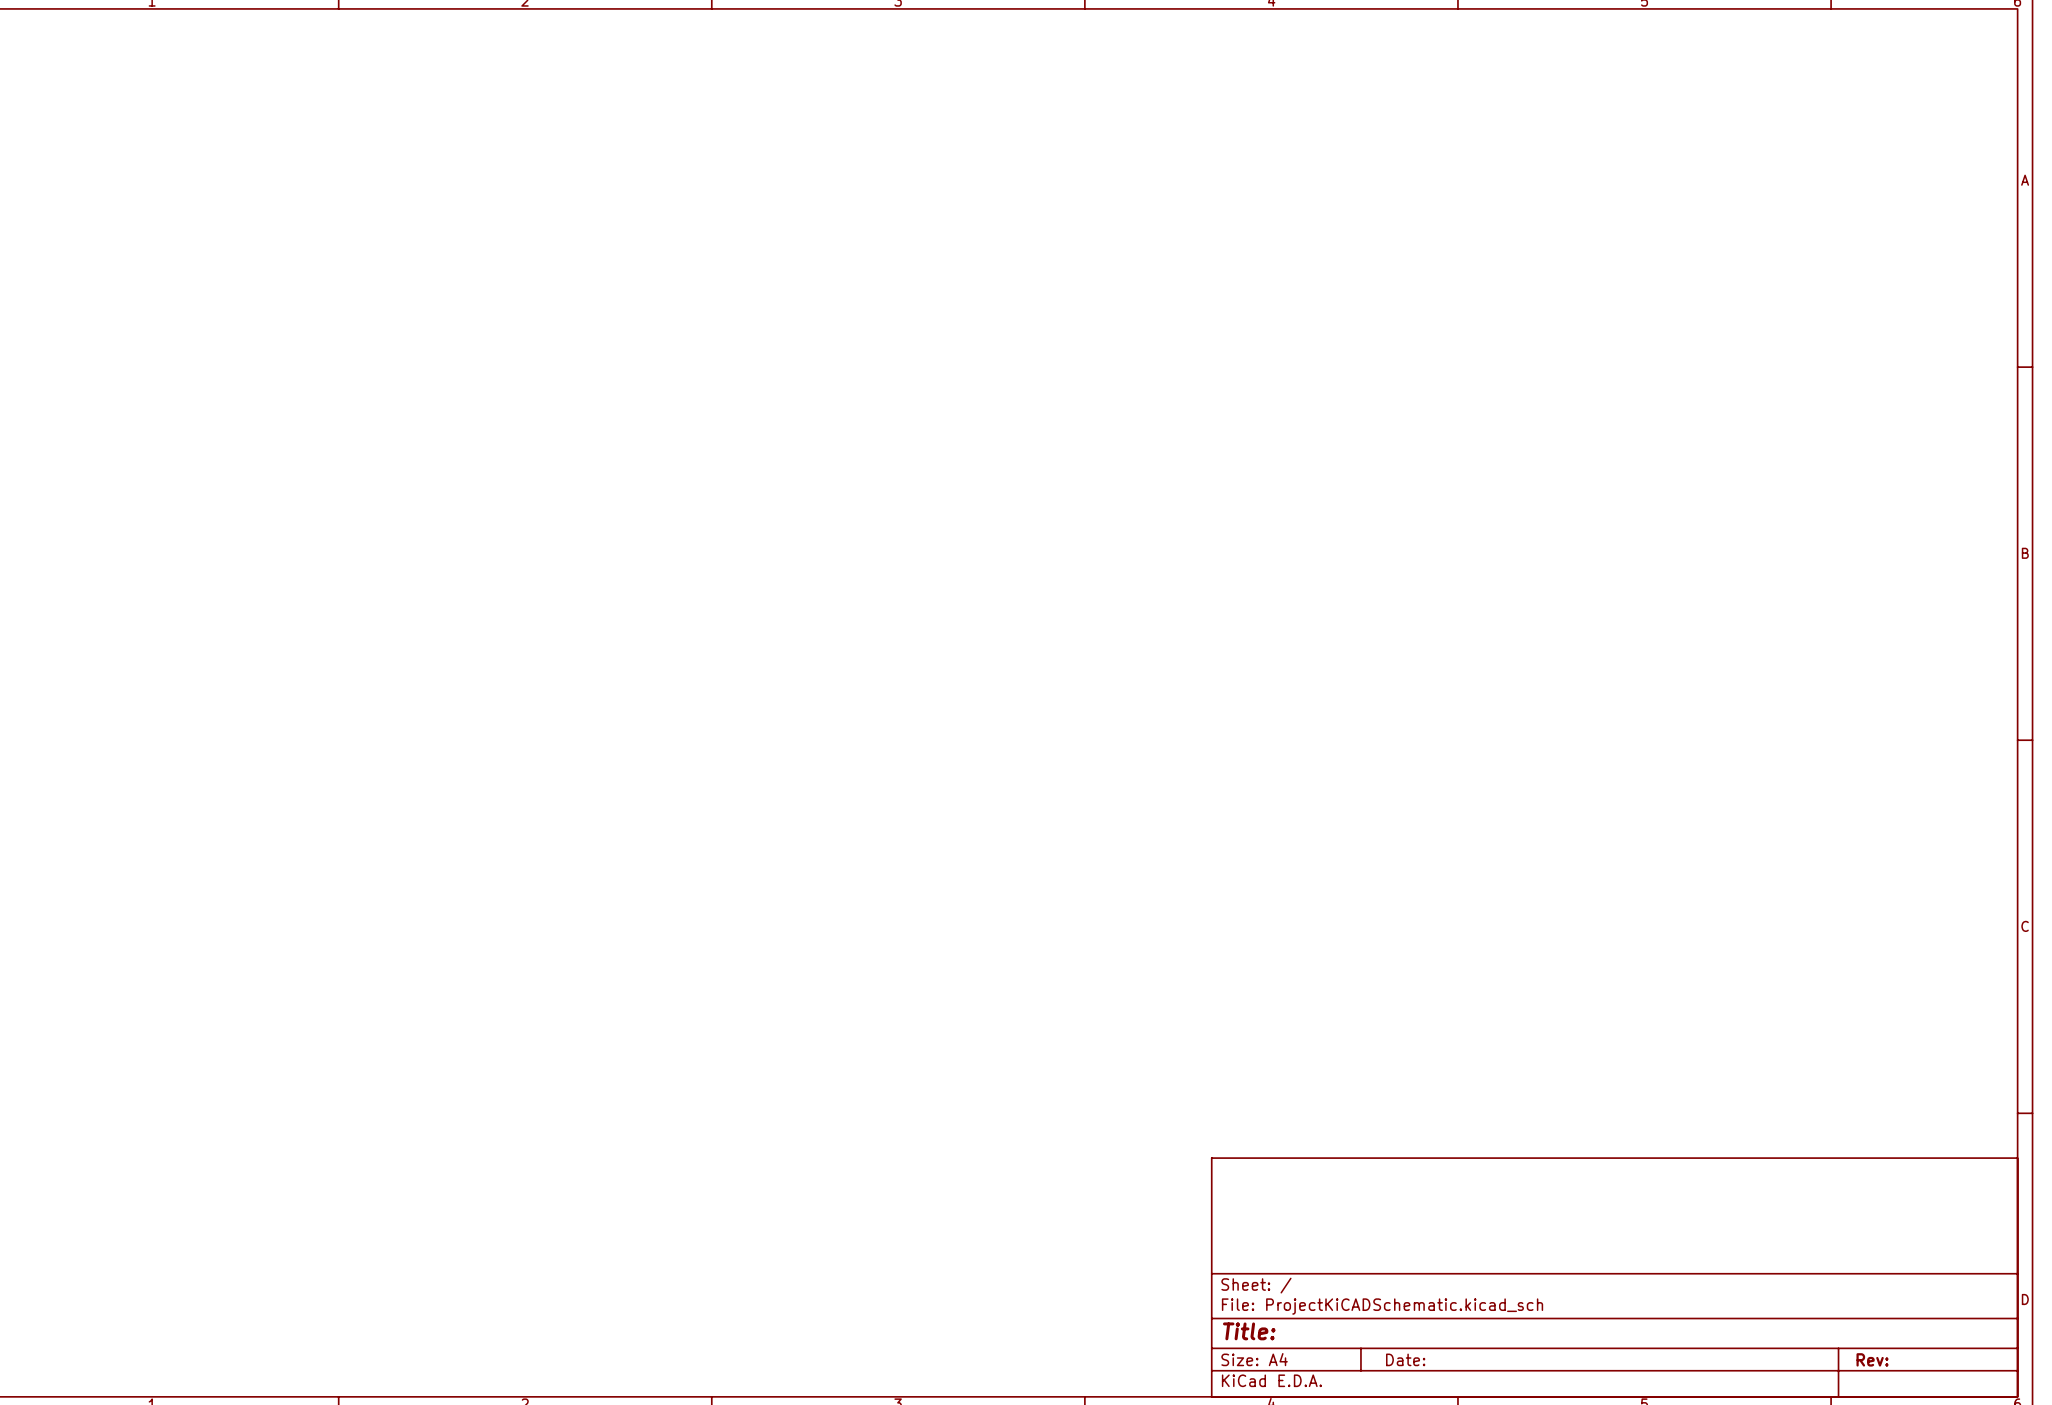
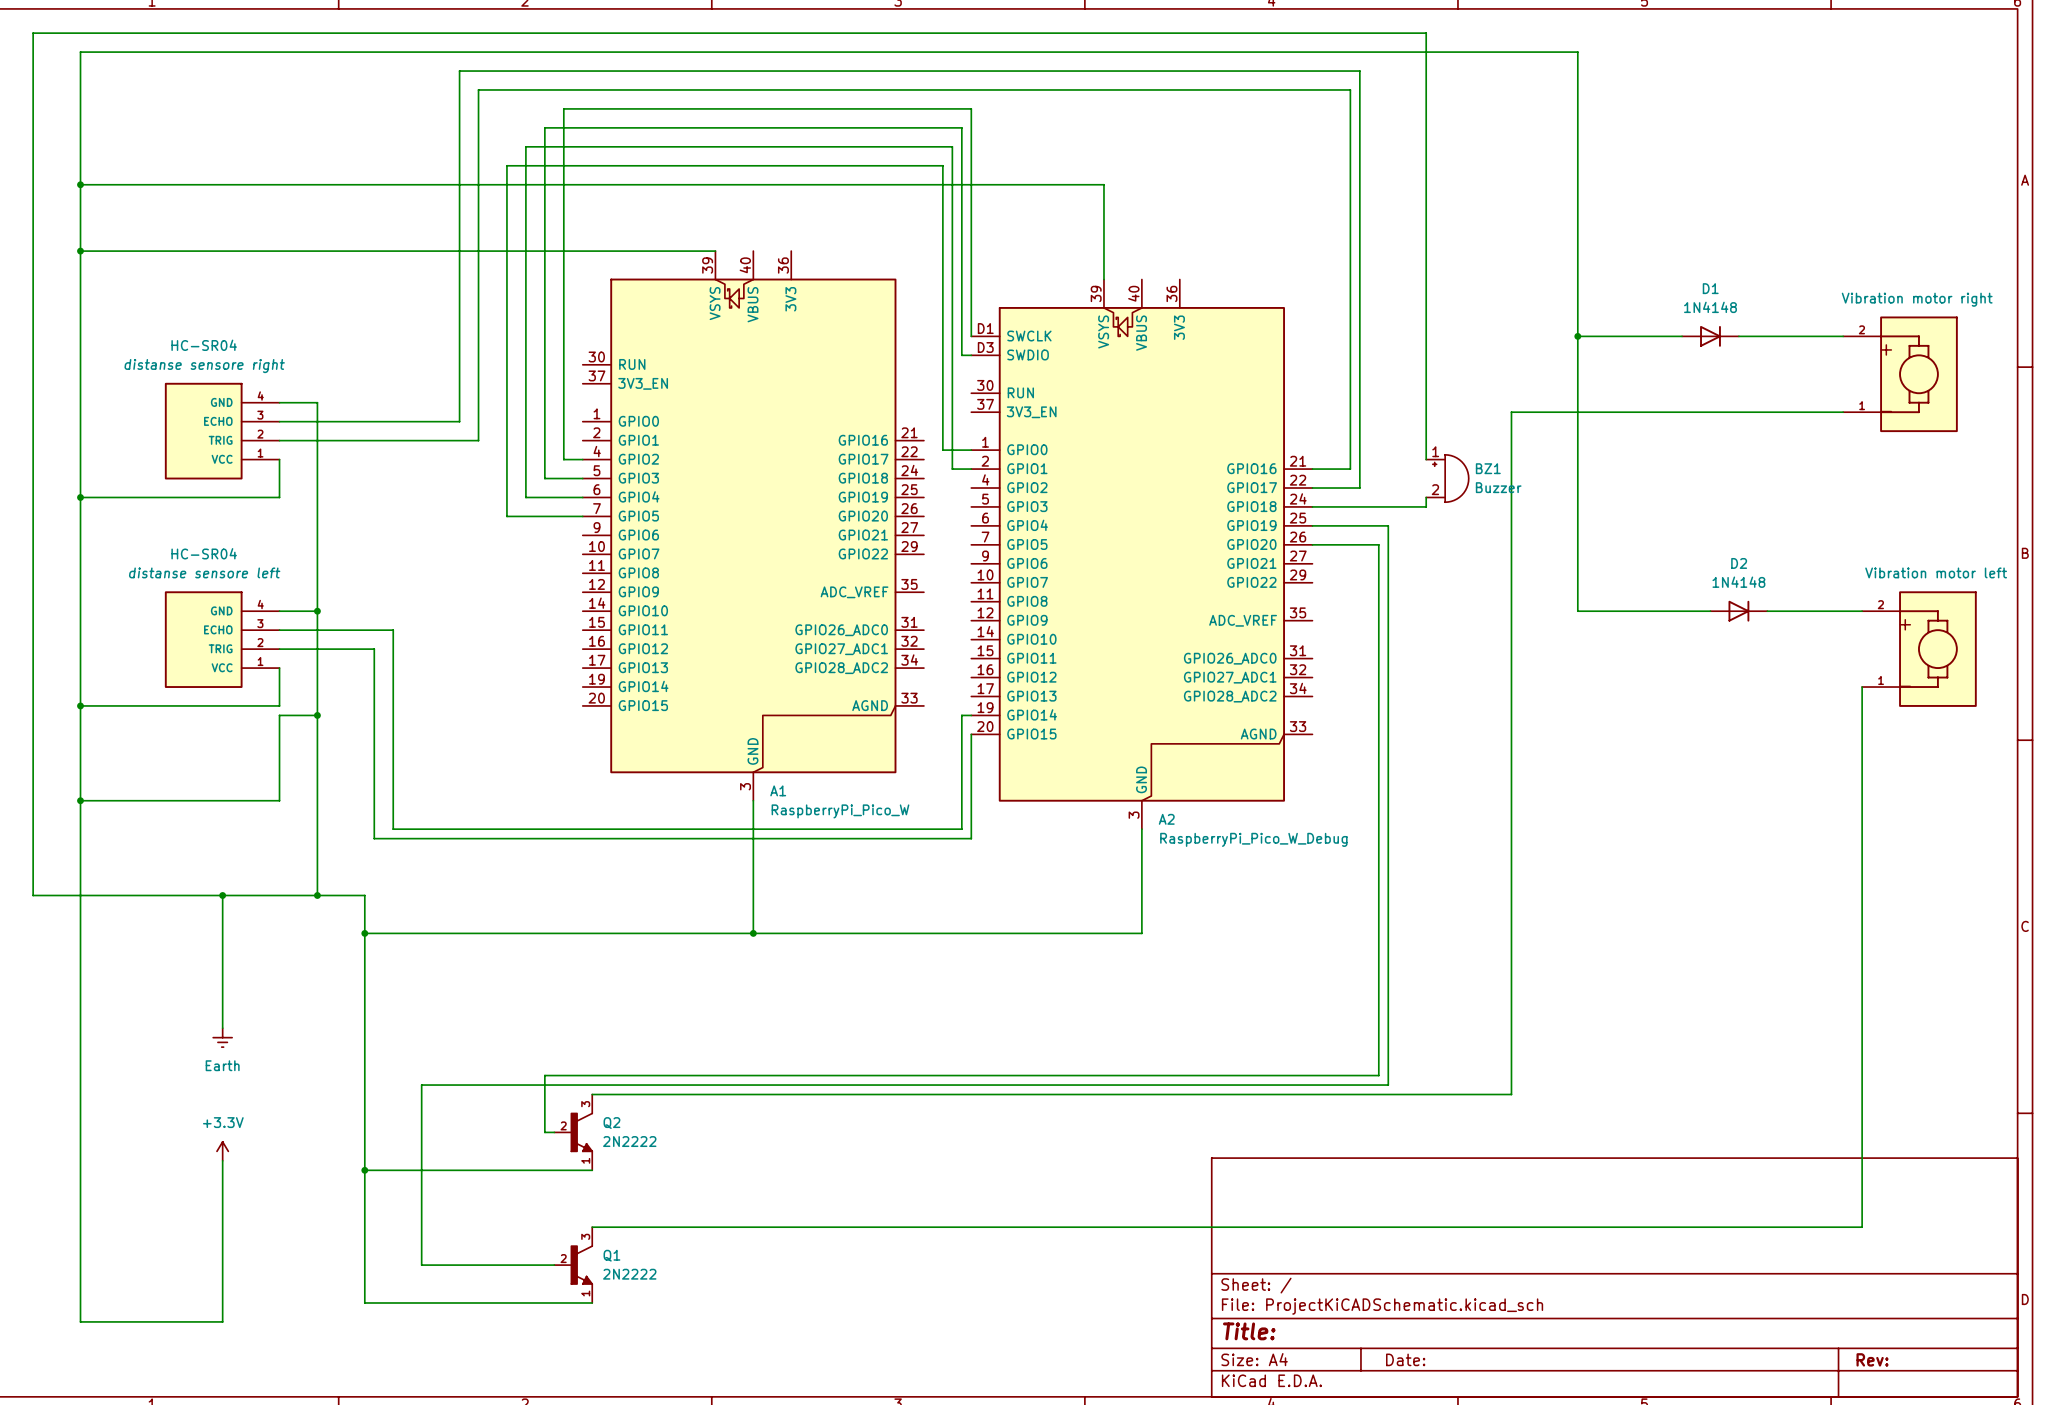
wire: none -> (80, 184) (1103, 184) (1103, 279)
junction: none -> (80, 184)
wire: none -> (80, 251) (715, 251)
junction: none -> (80, 251)
wire: none -> (971, 336) (971, 108) (563, 108) (563, 459) (582, 459)
wire: none -> (1577, 336) (1682, 336)
junction: none -> (1577, 336)
D1: none -> 1N4148 (1710, 336)
wire: none -> (1738, 336) (1843, 336)
wire: none -> (971, 355) (961, 355) (961, 127) (544, 127) (544, 478) (582, 478)
part: none -> Vibration motor right (1900, 374)
wire: none -> (279, 402) (317, 402) (317, 895)
wire: none -> (1843, 412) (1511, 412) (1511, 1094) (592, 1094)
wire: none -> (279, 421) (459, 421) (459, 71) (1359, 71) (1359, 488) (1312, 488)
part: none -> HC-SR04 (222, 431)
wire: none -> (279, 440) (478, 440) (478, 89) (1350, 89) (1350, 469) (1312, 469)
wire: none -> (971, 450) (942, 450) (942, 165) (506, 165) (506, 516) (582, 516)
wire: none -> (279, 459) (279, 497) (80, 497)
wire: none -> (1426, 459) (1426, 33) (33, 33) (33, 895) (364, 895) (364, 1302) (592, 1302)
wire: none -> (971, 469) (952, 469) (952, 146) (525, 146) (525, 497) (582, 497)
BZ1: none -> Buzzer (1447, 478)
junction: none -> (80, 497)
wire: none -> (1426, 497) (1426, 506) (1312, 506)
A1: none -> RaspberryPi_Pico_W (753, 525)
wire: none -> (1312, 525) (1388, 525) (1388, 1085) (421, 1085) (421, 1265) (554, 1265)
wire: none -> (1312, 544) (1378, 544) (1378, 1075) (544, 1075) (544, 1132) (554, 1132)
A2: none -> RaspberryPi_Pico_W_Debug (1141, 554)
wire: none -> (279, 611) (317, 611)
junction: none -> (317, 611)
wire: none -> (1710, 611) (1577, 611) (1577, 52) (80, 52) (80, 1321) (222, 1321) (222, 1160)
D2: none -> 1N4148 (1738, 611)
wire: none -> (1767, 611) (1862, 611)
wire: none -> (279, 630) (393, 630) (393, 829) (961, 829) (961, 715) (971, 715)
part: none -> HC-SR04 (222, 639)
wire: none -> (279, 649) (374, 649) (374, 838) (971, 838) (971, 734)
part: none -> Vibration motor left (1919, 649)
wire: none -> (279, 668) (279, 705) (80, 705)
wire: none -> (1862, 687) (1862, 1227) (592, 1227)
junction: none -> (80, 705)
wire: none -> (317, 715) (279, 715) (279, 800) (80, 800)
junction: none -> (317, 715)
junction: none -> (80, 800)
wire: none -> (753, 800) (753, 933)
wire: none -> (1141, 829) (1141, 933) (364, 933)
wire: none -> (222, 895) (222, 1028)
junction: none -> (222, 895)
junction: none -> (317, 895)
junction: none -> (364, 933)
junction: none -> (753, 933)
power symbol: none -> Earth (222, 1037)
Q2: none -> 2N2222 (573, 1132)
power symbol: none -> +3.3V (222, 1151)
wire: none -> (364, 1170) (592, 1170)
junction: none -> (364, 1170)
Q1: none -> 2N2222 (573, 1265)

